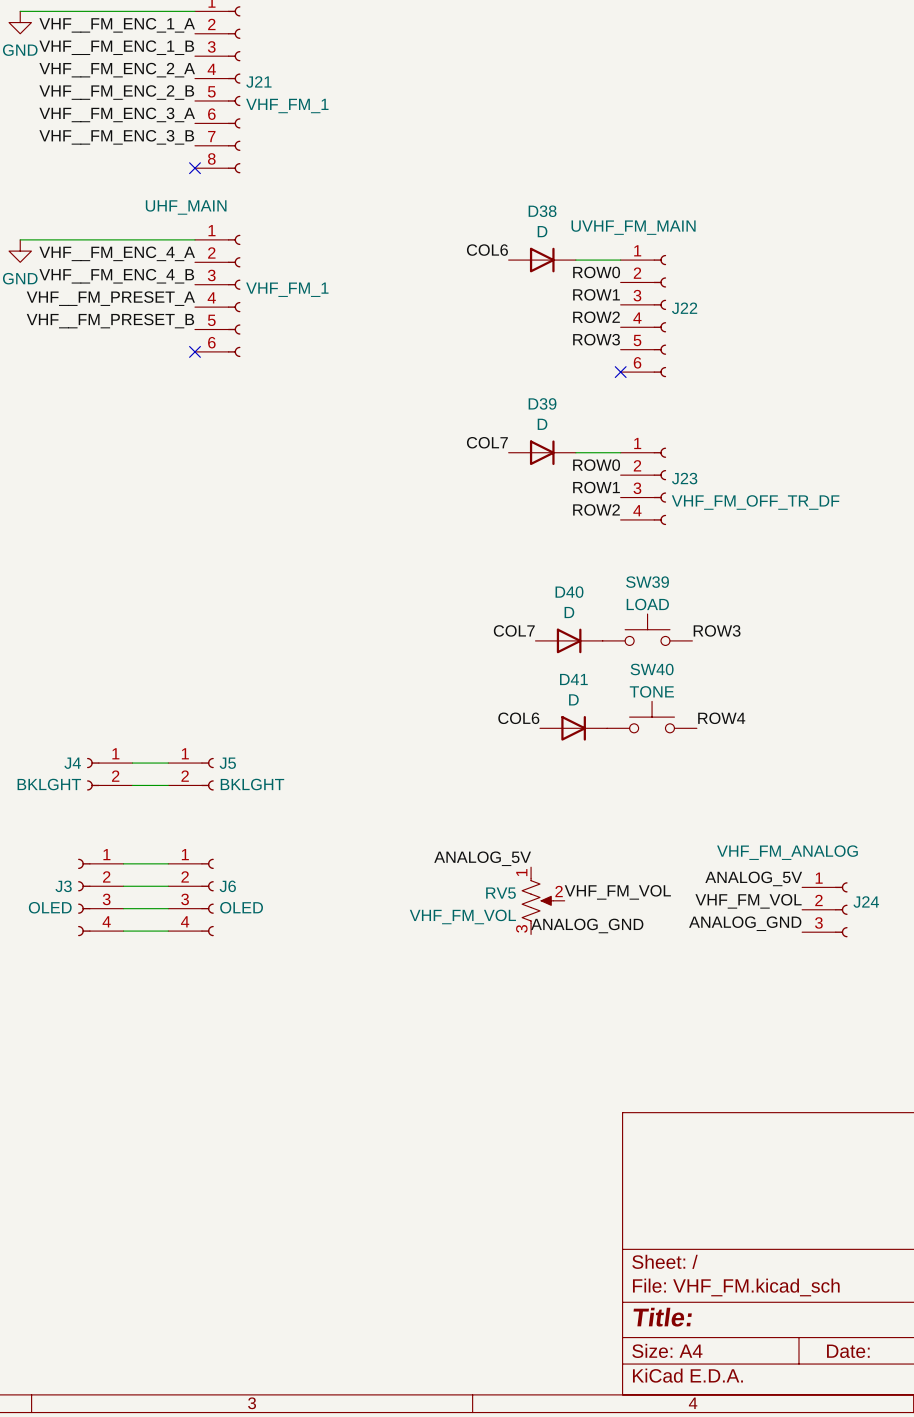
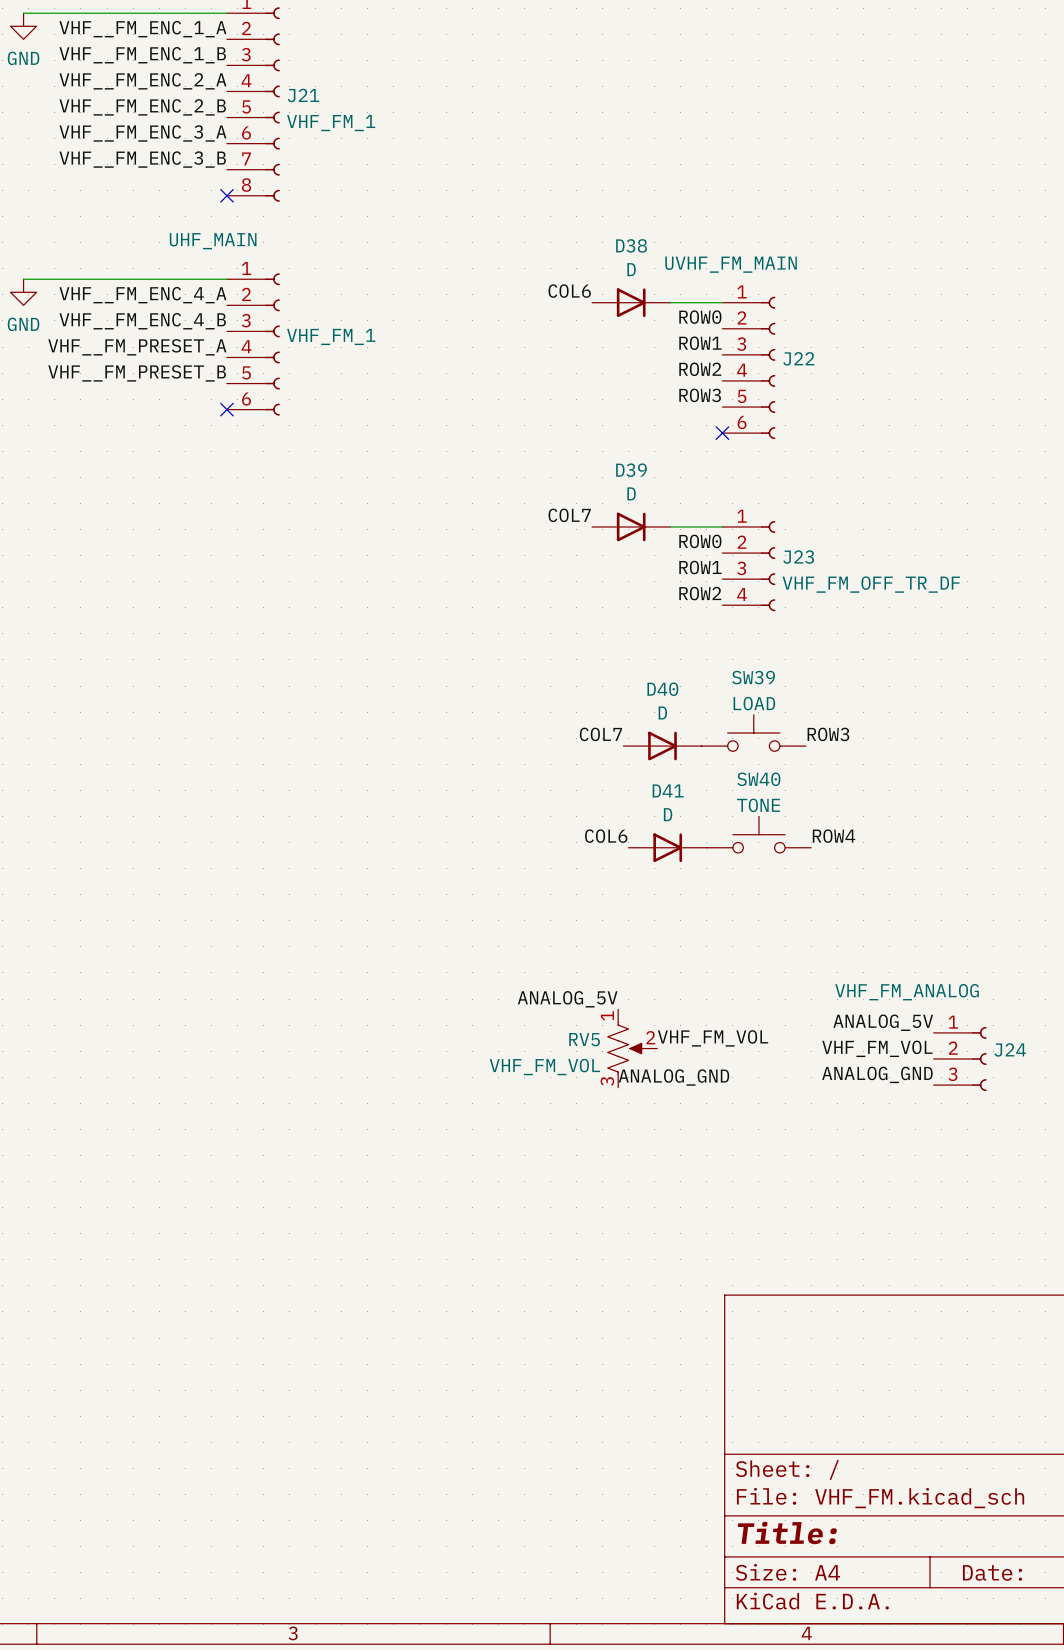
wire: (132, 763) (168, 763) -> none
J4: BKLGHT (109, 774) -> none
J5: BKLGHT (191, 774) -> none
wire: (132, 785) (168, 785) -> none
wire: (123, 863) (168, 863) -> none
wire: (123, 886) (168, 886) -> none
J3: OLED (100, 897) -> none
J6: OLED (191, 897) -> none
wire: (123, 908) (168, 908) -> none
wire: (123, 931) (168, 931) -> none

